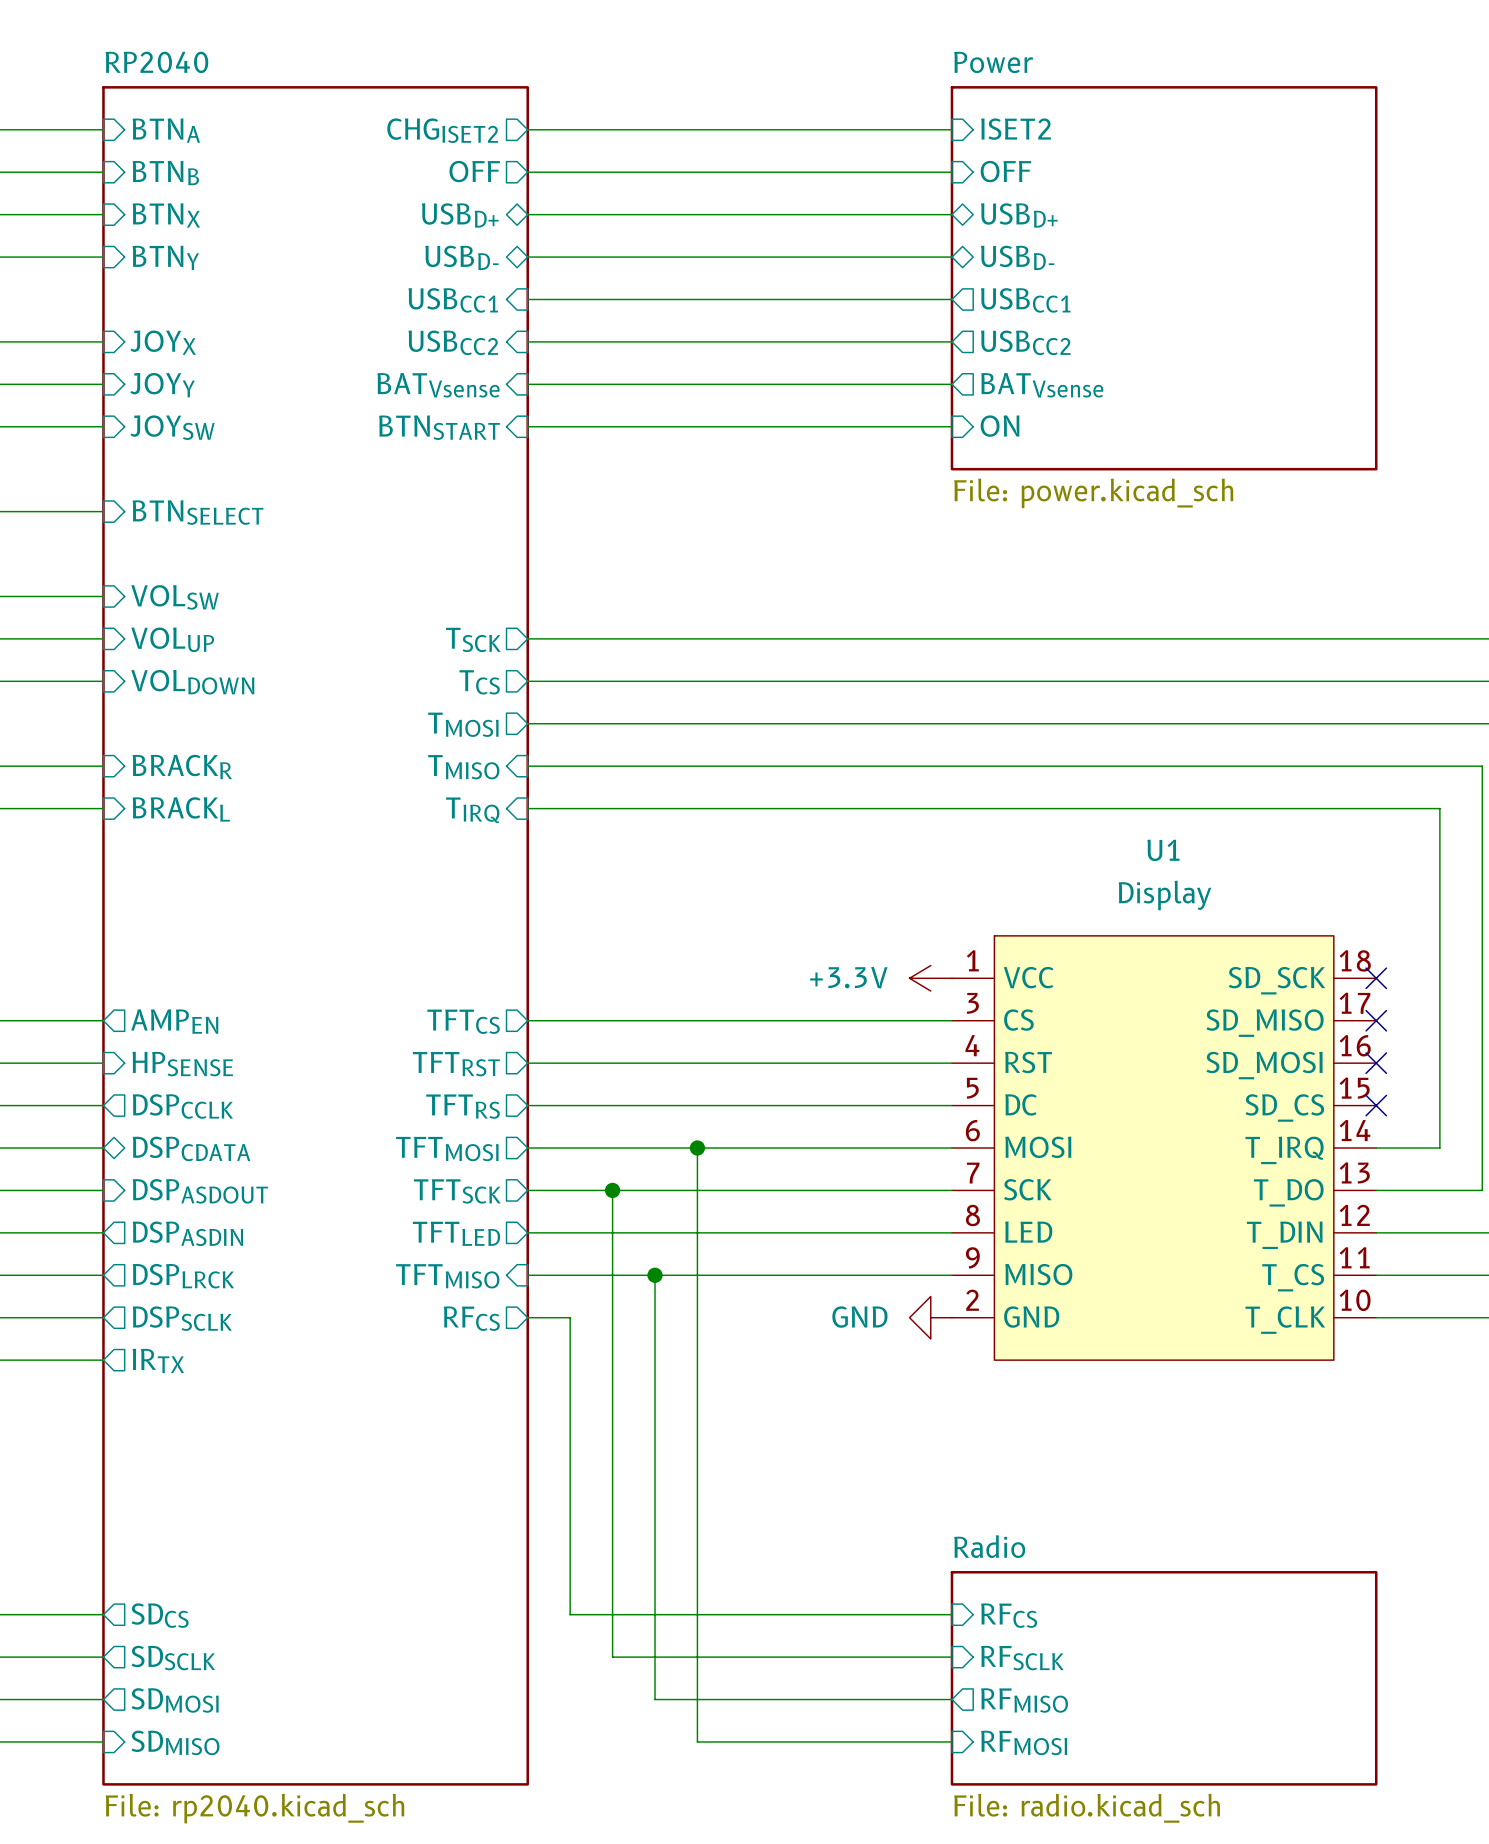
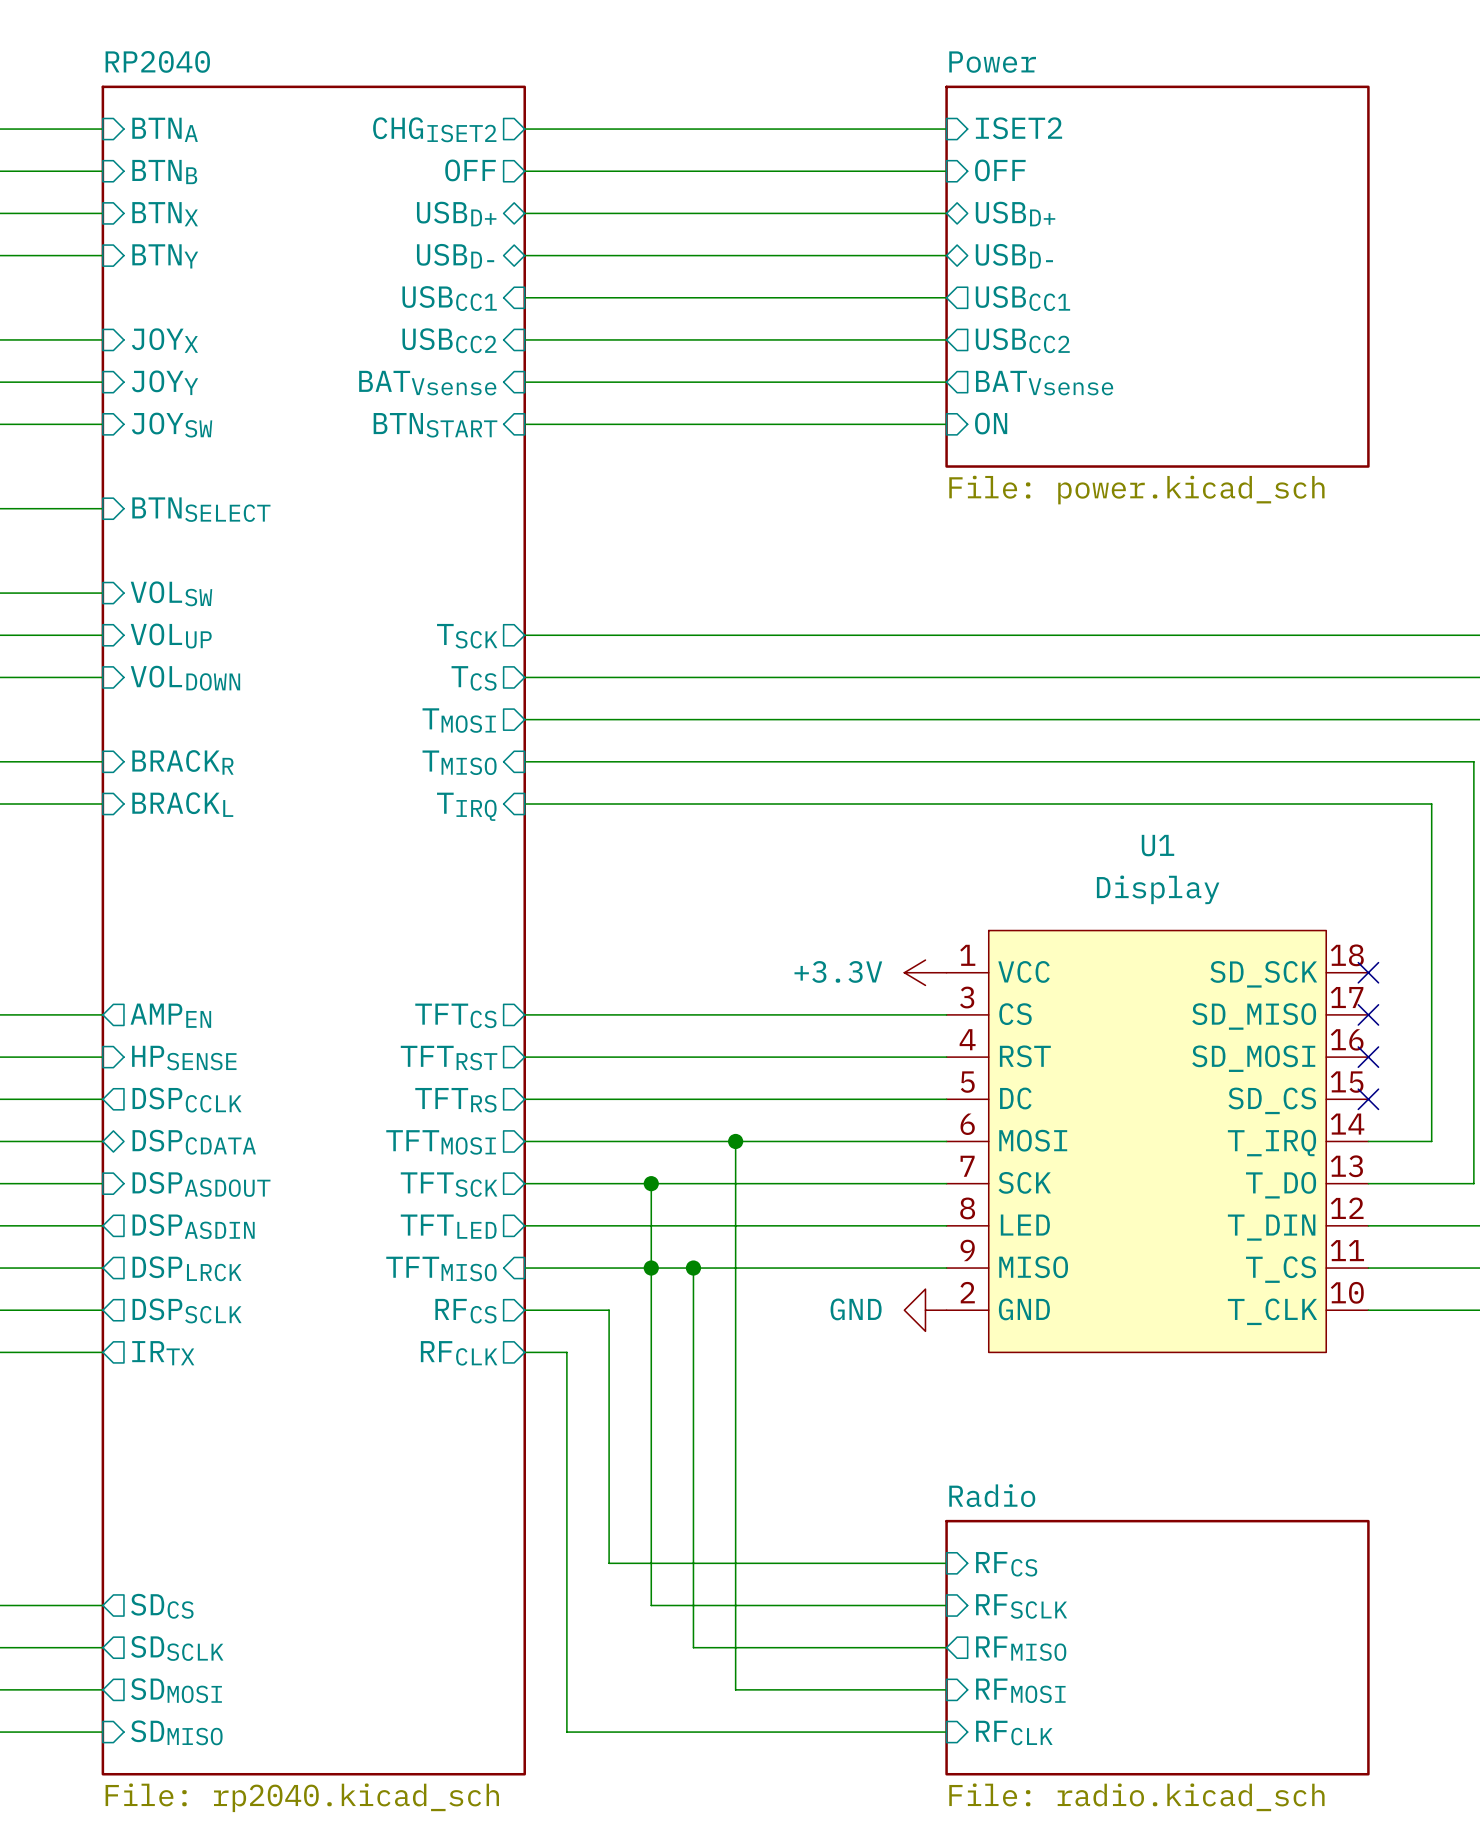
wire: (697, 1148) (697, 1275) -> none
junction: (697, 1148) -> none
junction: none -> (735, 1141)
wire: (612, 1190) (612, 1317) -> (566, 1310) (609, 1310)
junction: (612, 1190) -> none
wire: none -> (651, 1183) (651, 1268)
junction: none -> (651, 1183)
junction: none -> (693, 1268)
wire: (570, 1317) (570, 1360) -> (524, 1352) (566, 1352)
sheet pin: none -> RFCLK (459, 1353)
wire: (612, 1572) (612, 1657) (697, 1657) (697, 1741) -> (566, 1605) (566, 1732) (693, 1732)
wire: none -> (609, 1563) (946, 1563)
sheet pin: none -> RFCS (1006, 1564)
wire: (570, 1614) (655, 1614) (655, 1699) (739, 1699) -> (735, 1141) (735, 1689)
sheet pin: RFCS (1009, 1615) -> RFSCLK (1021, 1606)
sheet Radio: none -> File: radio.kicad_sch (1157, 1647)
sheet pin shape: input (1022, 1658) -> output (1021, 1648)
sheet pin: RFSCLK (1022, 1658) -> RFMISO (1021, 1648)
sheet Radio: File: radio.kicad_sch (1164, 1678) -> none
sheet pin shape: output (1024, 1700) -> input (1020, 1690)
sheet pin: RFMISO (1024, 1700) -> RFMOSI (1020, 1690)
sheet pin: RFMOSI (1024, 1742) -> RFCLK (1014, 1733)

